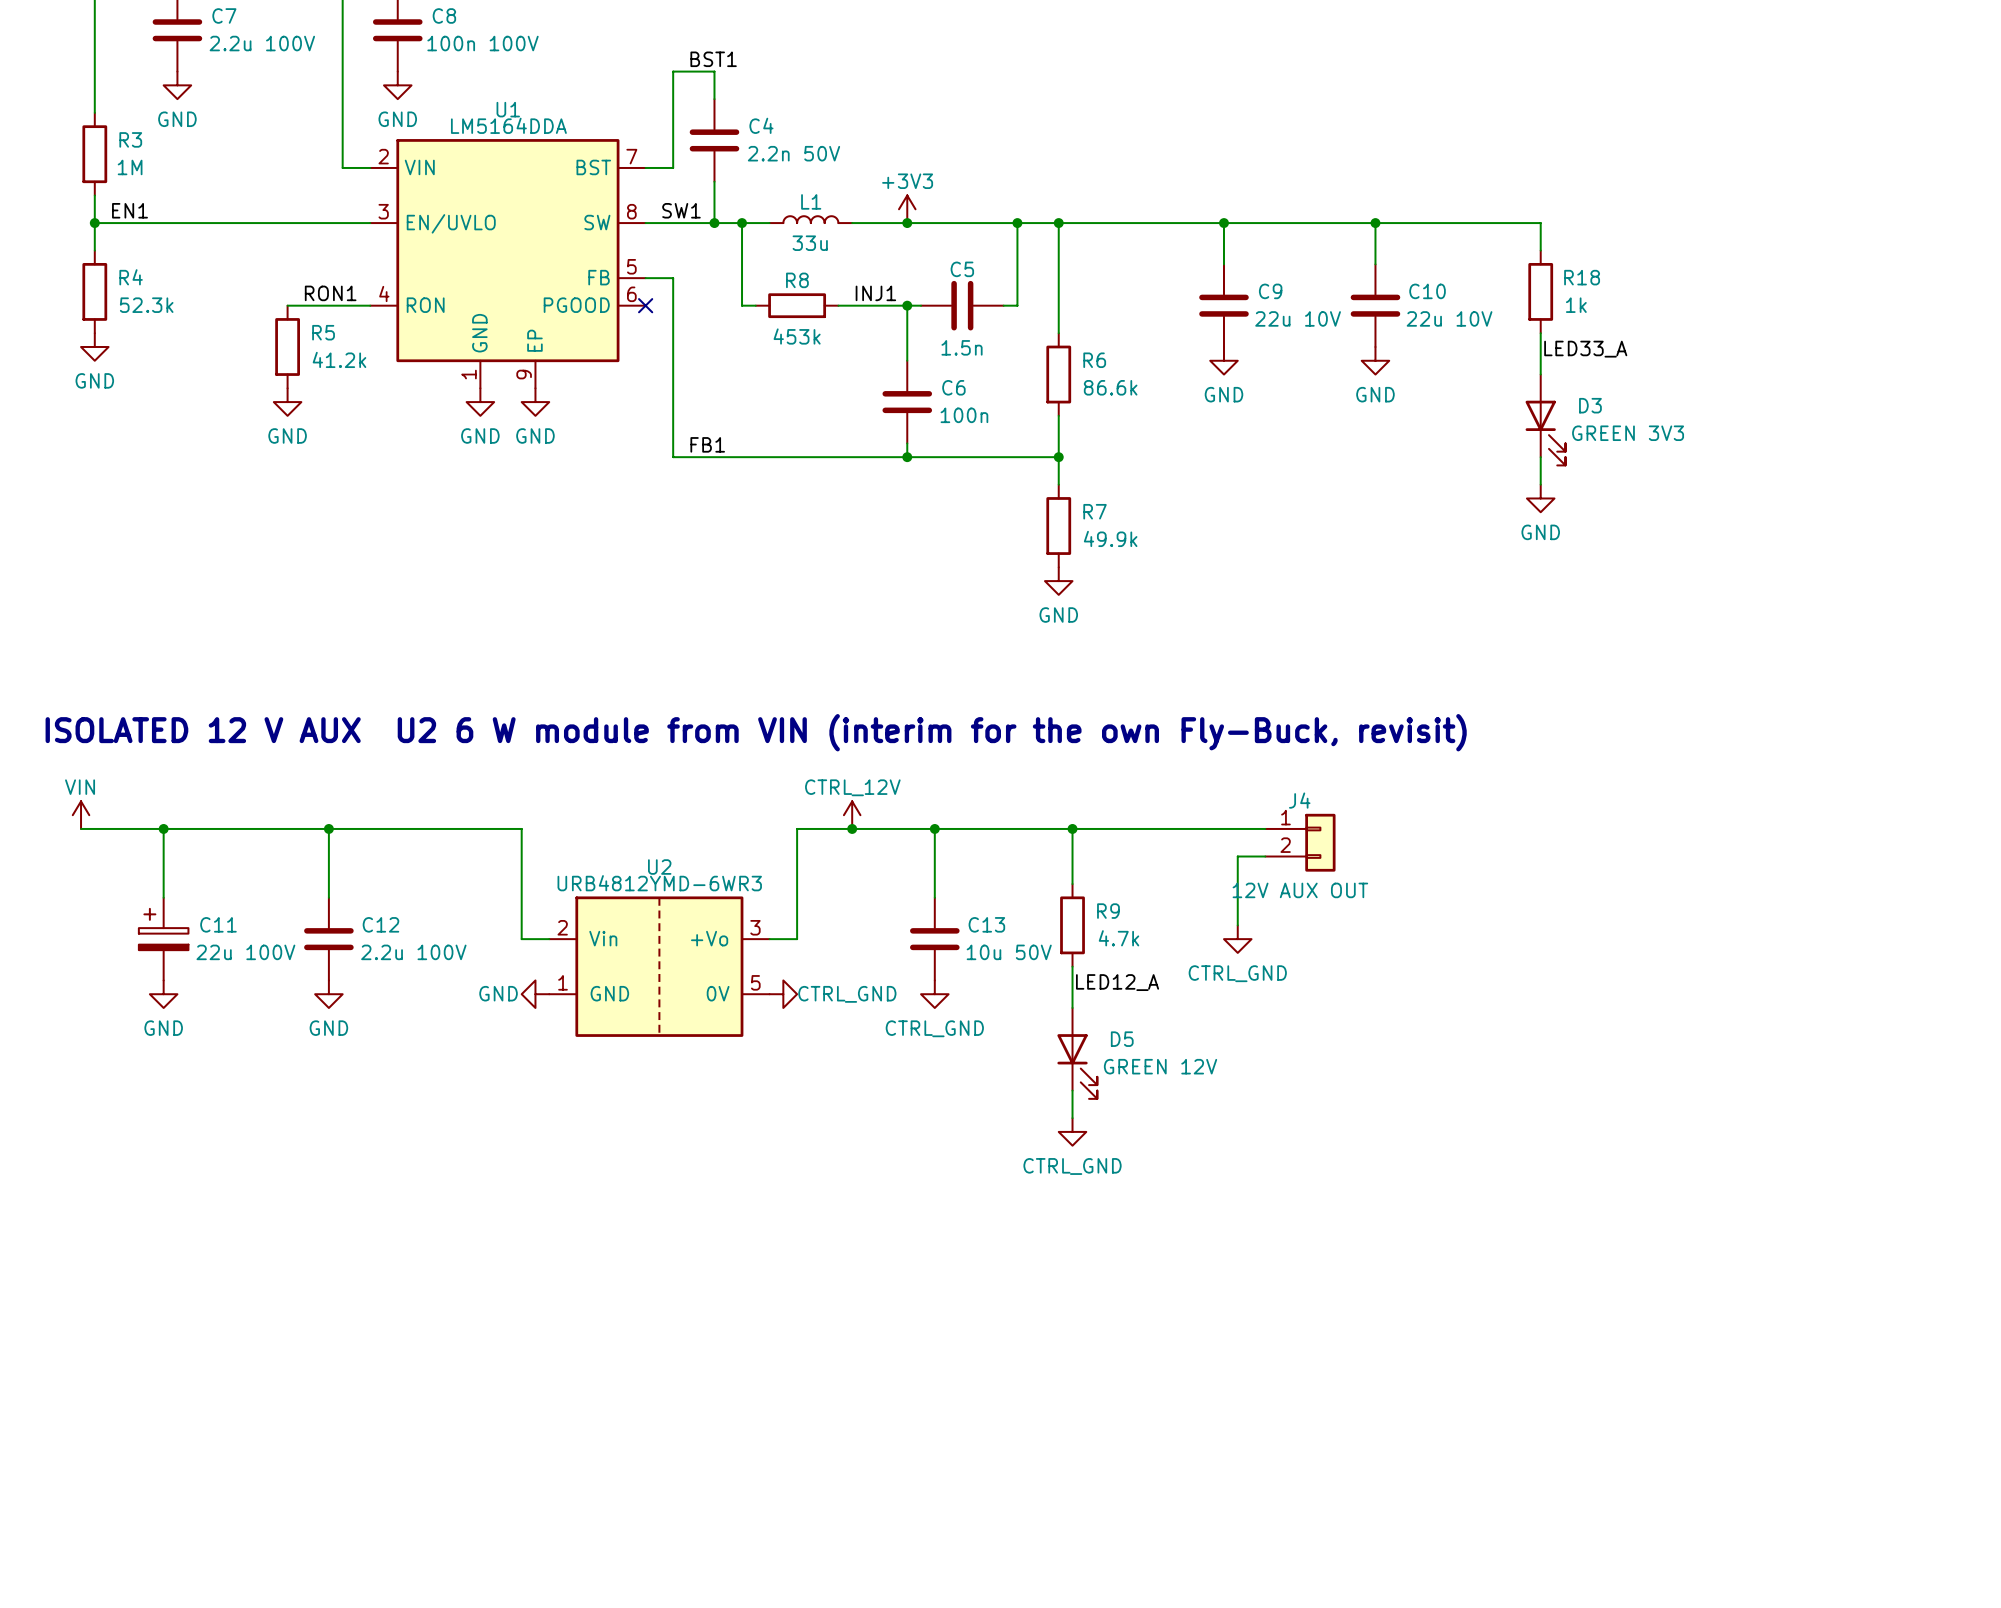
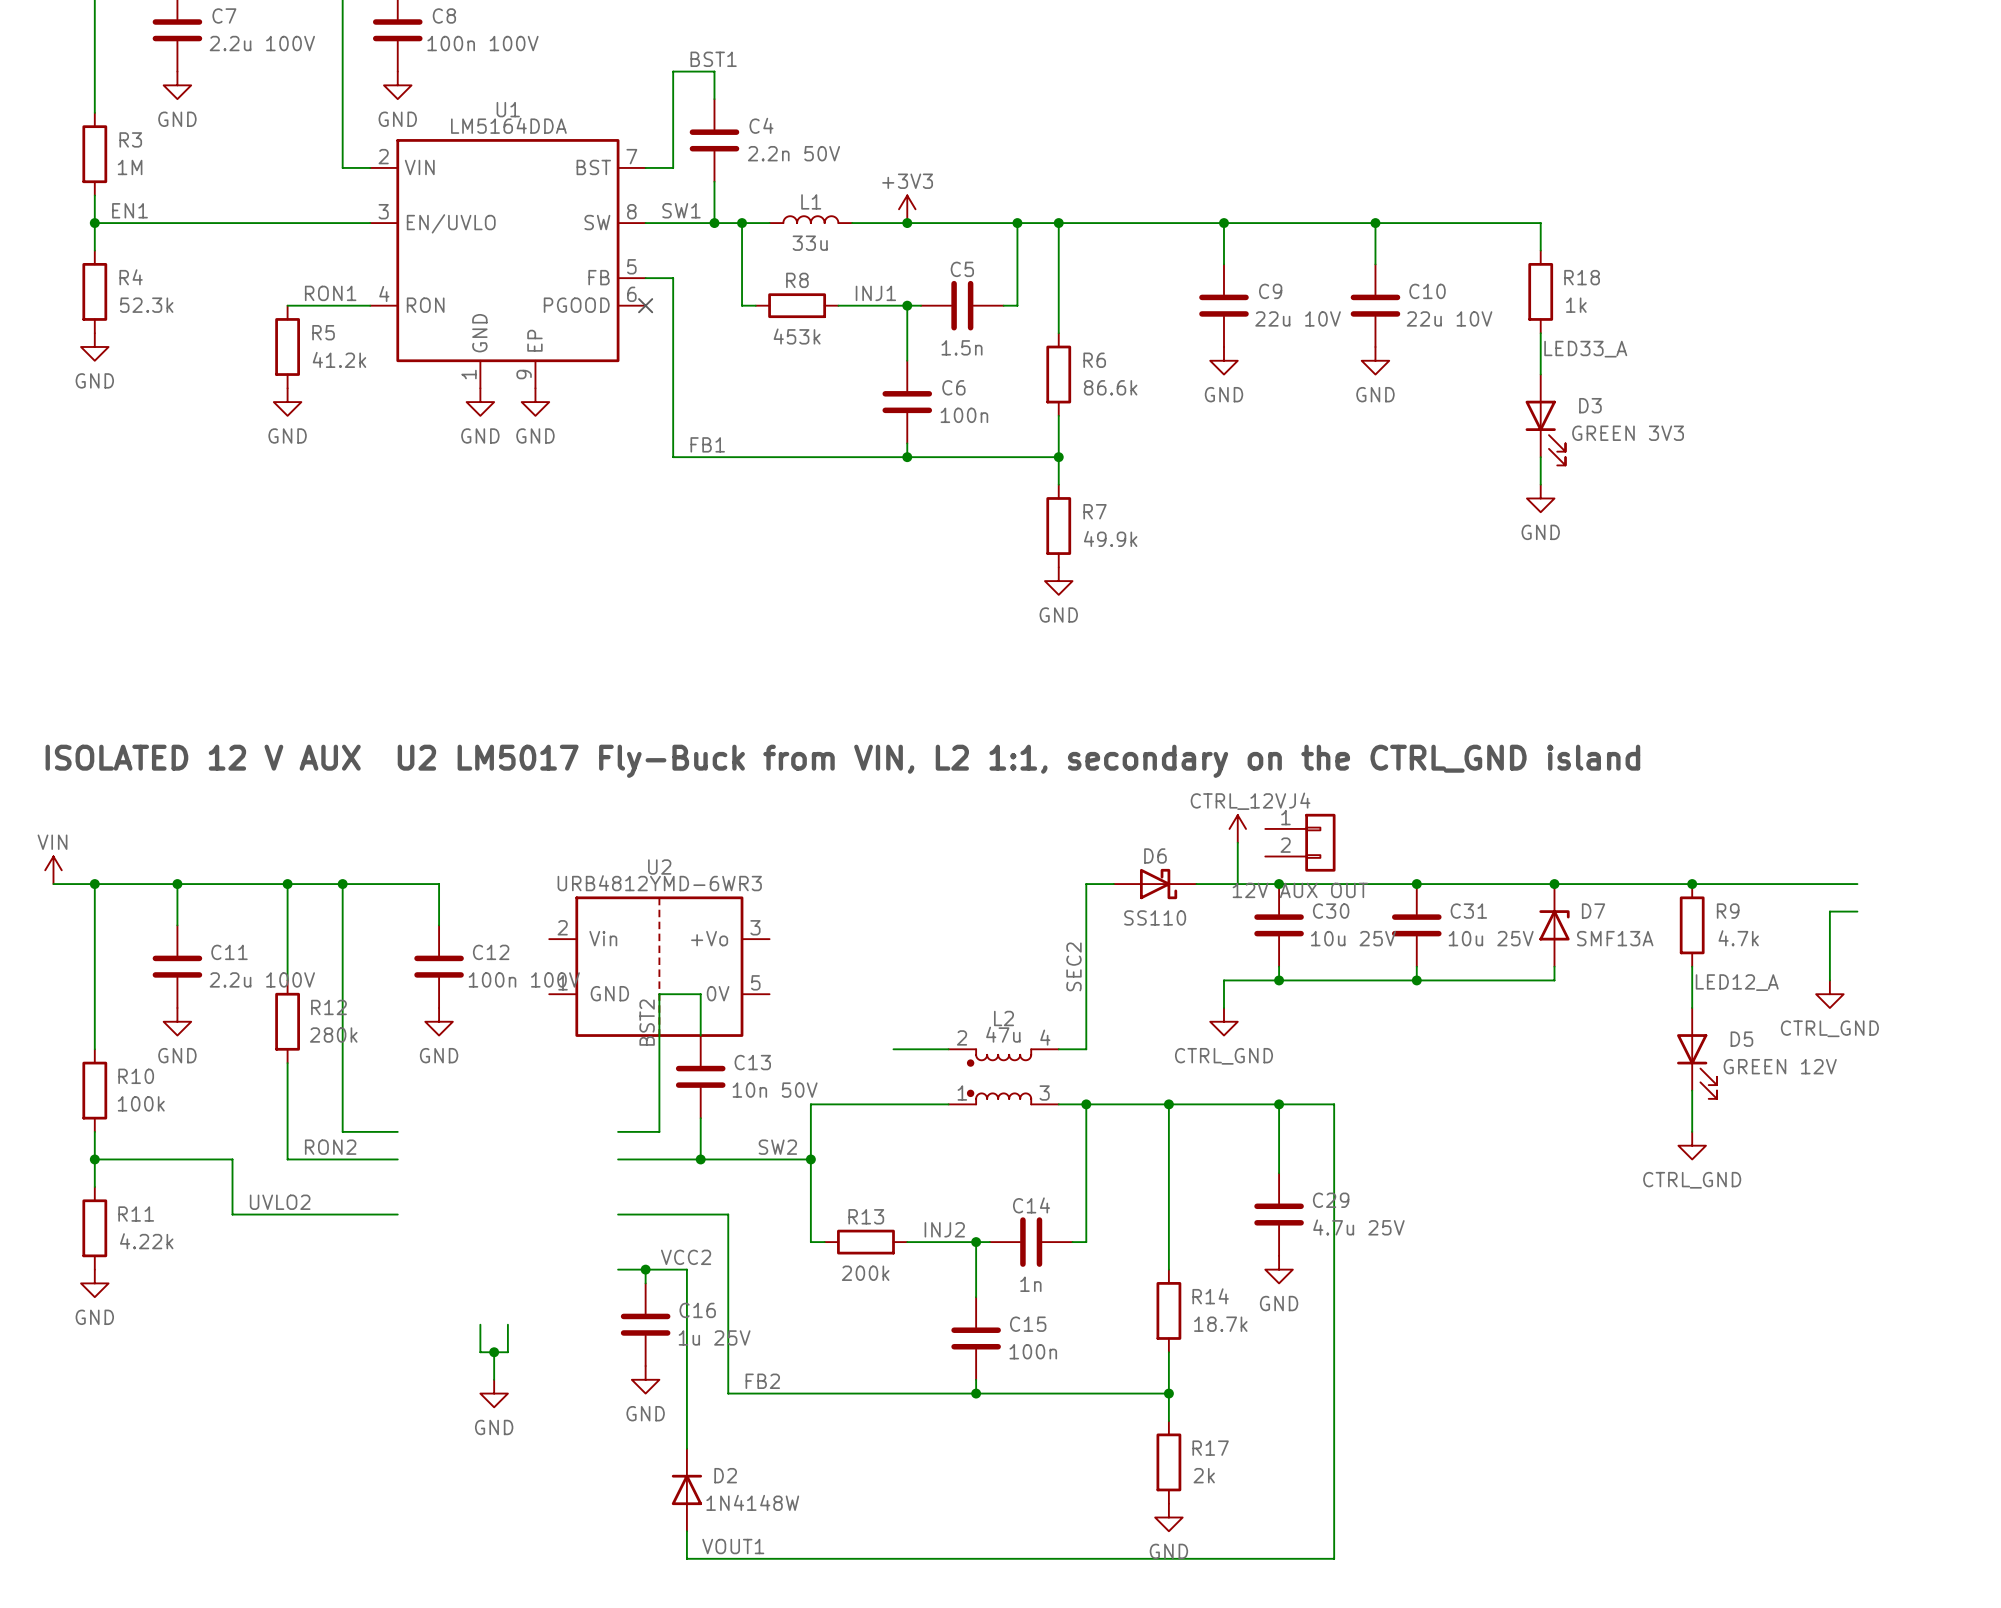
text: ISOLATED 12 V AUX U2 6 W module from VIN (interim for the own Fly-Buck, revisit) (756, 732) -> none
text: none -> ISOLATED 12 V AUX U2 LM5017 Fly-Buck from VIN, L2 1:1, secondary on the CTRL_GND island (842, 761)
power symbol position: VIN (81, 815) -> VIN (53, 870)
power symbol: CTRL_12V (852, 815) -> none
wire: (81, 828) (521, 828) (521, 939) (549, 939) -> none
wire: (163, 828) (163, 897) -> none
junction: (163, 828) -> none
wire: (328, 828) (328, 897) -> none
junction: (328, 828) -> none
junction: (852, 828) -> none
wire: (934, 828) (934, 897) -> none
junction: (934, 828) -> none
wire: (1072, 828) (1072, 884) -> none
junction: (1072, 828) -> none
power symbol: none -> CTRL_12V (1237, 828)
wire: (1265, 828) (797, 828) (797, 939) (769, 939) -> none
wire: (1237, 856) (1265, 856) -> (1237, 856) (1237, 842)
wire: none -> (53, 884) (439, 884) (439, 925)
wire: none -> (94, 884) (94, 1049)
junction: none -> (94, 884)
wire: none -> (177, 884) (177, 925)
junction: none -> (177, 884)
wire: none -> (287, 884) (287, 980)
junction: none -> (287, 884)
wire: none -> (342, 884) (342, 1131) (397, 1131)
junction: none -> (342, 884)
wire: none -> (1113, 884) (1086, 884) (1086, 1049) (1058, 1049)
D6: none -> SS110 (1155, 884)
wire: none -> (1196, 884) (1857, 884)
wire: (1237, 884) (1237, 925) -> none
junction: none -> (1279, 884)
junction: none -> (1416, 884)
junction: none -> (1554, 884)
junction: none -> (1692, 884)
C11 symbol: [138, 897, 189, 981] -> [152, 925, 203, 1008]
wire: none -> (1857, 911) (1829, 911) (1829, 980)
R9 position: (1072, 925) -> (1692, 925)
C30: none -> 10u 25V (1279, 925)
C31: none -> 10u 25V (1416, 925)
D7: none -> SMF13A (1554, 925)
C12 position: (328, 939) -> (439, 966)
C13 position: (934, 939) -> (700, 1076)
power symbol position: CTRL_GND (1237, 939) -> CTRL_GND (1223, 1021)
C11 value: 22u 100V (245, 952) -> 2.2u 100V (262, 979)
C12 value: 2.2u 100V (413, 952) -> 100n 100V (524, 979)
C13 value: 10u 50V (1009, 952) -> 10n 50V (775, 1090)
wire: (1072, 966) (1072, 1007) -> none
wire: none -> (1416, 966) (1416, 980)
wire: none -> (1554, 966) (1554, 980) (1223, 980) (1223, 1007)
wire: none -> (1692, 966) (1692, 1007)
junction: none -> (1279, 980)
junction: none -> (1416, 980)
label: LED12_A (1117, 982) -> SEC2 (1074, 966)
label: none -> LED12_A (1737, 982)
power symbol position: GND (163, 994) -> GND (177, 1021)
power symbol: GND (328, 994) -> none
power symbol: GND (535, 994) -> none
power symbol: CTRL_GND (783, 994) -> none
power symbol: CTRL_GND (934, 994) -> none
power symbol: none -> CTRL_GND (1829, 994)
R12: none -> 280k (287, 1021)
power symbol: none -> GND (439, 1021)
label: none -> BST2 (647, 1022)
wire: none -> (700, 1035) (700, 994) (659, 994) (659, 1131) (618, 1131)
wire: none -> (893, 1049) (948, 1049)
D5 position: (1077, 1053) -> (1697, 1053)
wire: none -> (287, 1063) (287, 1159) (397, 1159)
L2: none -> 47u (1003, 1076)
R10: none -> 100k (94, 1090)
wire: (1072, 1090) (1072, 1118) -> none
wire: none -> (1692, 1090) (1692, 1131)
wire: none -> (948, 1104) (810, 1104) (810, 1242) (824, 1242)
wire: none -> (1058, 1104) (1334, 1104) (1334, 1558) (686, 1558) (686, 1531)
wire: none -> (1086, 1104) (1086, 1242) (1072, 1242)
junction: none -> (1086, 1104)
wire: none -> (1168, 1104) (1168, 1269)
junction: none -> (1168, 1104)
wire: none -> (1279, 1104) (1279, 1173)
junction: none -> (1279, 1104)
wire: none -> (700, 1118) (700, 1159)
wire: none -> (94, 1131) (94, 1187)
power symbol: CTRL_GND (1072, 1131) -> none
power symbol: none -> CTRL_GND (1692, 1145)
label: none -> RON2 (330, 1147)
label: none -> SW2 (777, 1147)
wire: none -> (94, 1159) (232, 1159) (232, 1214) (397, 1214)
junction: none -> (94, 1159)
wire: none -> (618, 1159) (810, 1159)
junction: none -> (700, 1159)
junction: none -> (810, 1159)
label: none -> UVLO2 (280, 1202)
wire: none -> (618, 1214) (728, 1214) (728, 1393) (1168, 1393)
C29: none -> 4.7u 25V (1279, 1214)
R11: none -> 4.22k (94, 1228)
label: none -> INJ2 (944, 1229)
R13: none -> 200k (865, 1242)
wire: none -> (907, 1242) (989, 1242)
wire: none -> (976, 1242) (976, 1297)
junction: none -> (976, 1242)
C14: none -> 1n (1031, 1242)
label: none -> VCC2 (686, 1257)
wire: none -> (618, 1269) (686, 1269) (686, 1448)
wire: none -> (645, 1269) (645, 1283)
junction: none -> (645, 1269)
power symbol: none -> GND (1279, 1269)
power symbol: none -> GND (94, 1283)
R14: none -> 18.7k (1168, 1310)
wire: none -> (480, 1324) (480, 1352) (507, 1352) (507, 1324)
C16: none -> 1u 25V (645, 1324)
C15: none -> 100n (976, 1338)
wire: none -> (494, 1352) (494, 1379)
junction: none -> (494, 1352)
wire: none -> (1168, 1352) (1168, 1421)
power symbol: none -> GND (645, 1379)
wire: none -> (976, 1379) (976, 1393)
label: none -> FB2 (762, 1381)
power symbol: none -> GND (494, 1393)
junction: none -> (976, 1393)
junction: none -> (1168, 1393)
R17: none -> 2k (1168, 1462)
D2: none -> 1N4148W (686, 1489)
power symbol: none -> GND (1168, 1517)
label: none -> VOUT1 (733, 1546)

